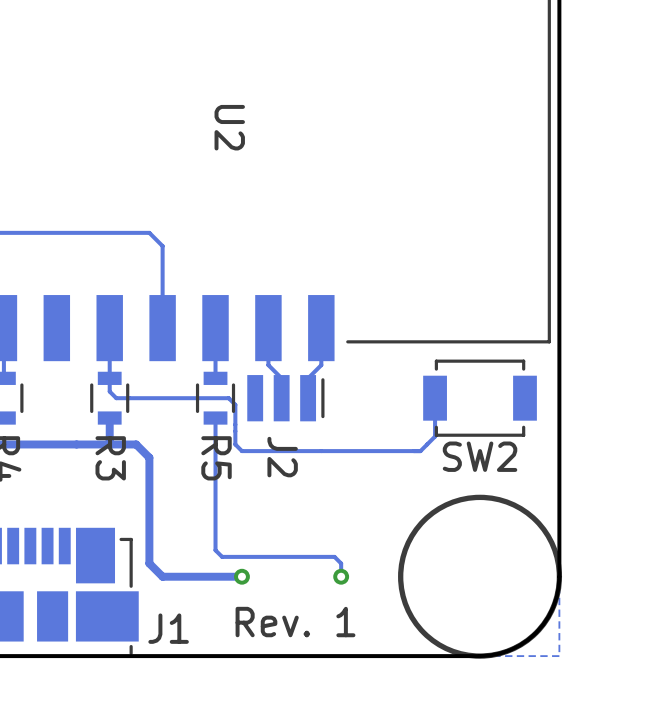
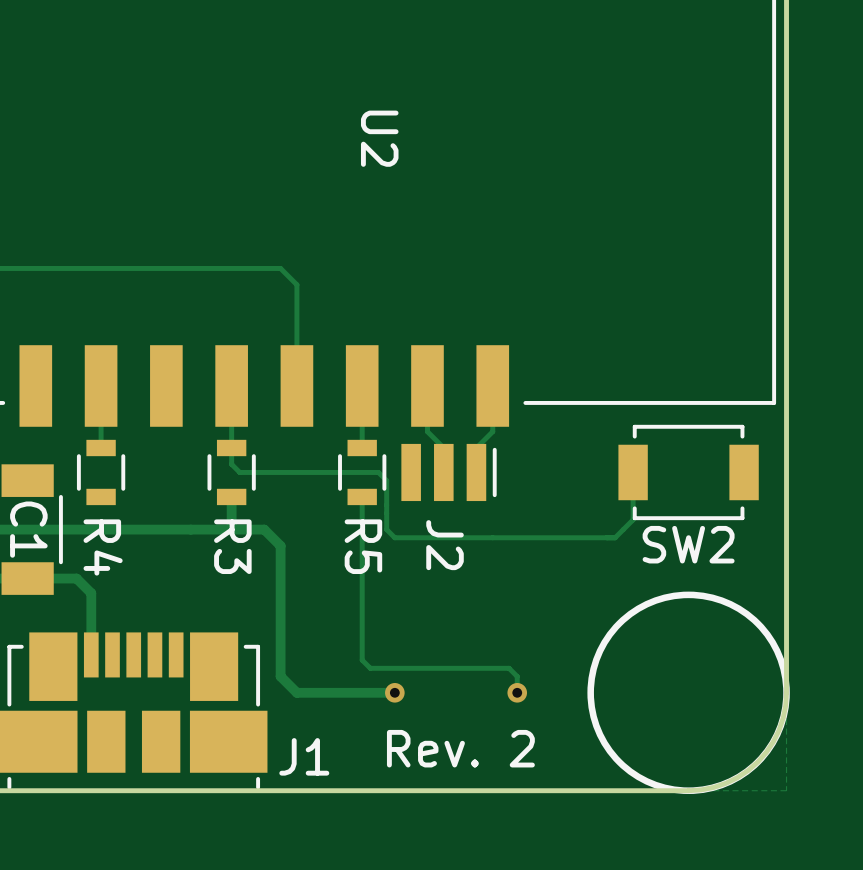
text: Rev. 1 (295, 622) -> Rev. 2 (460, 748)

